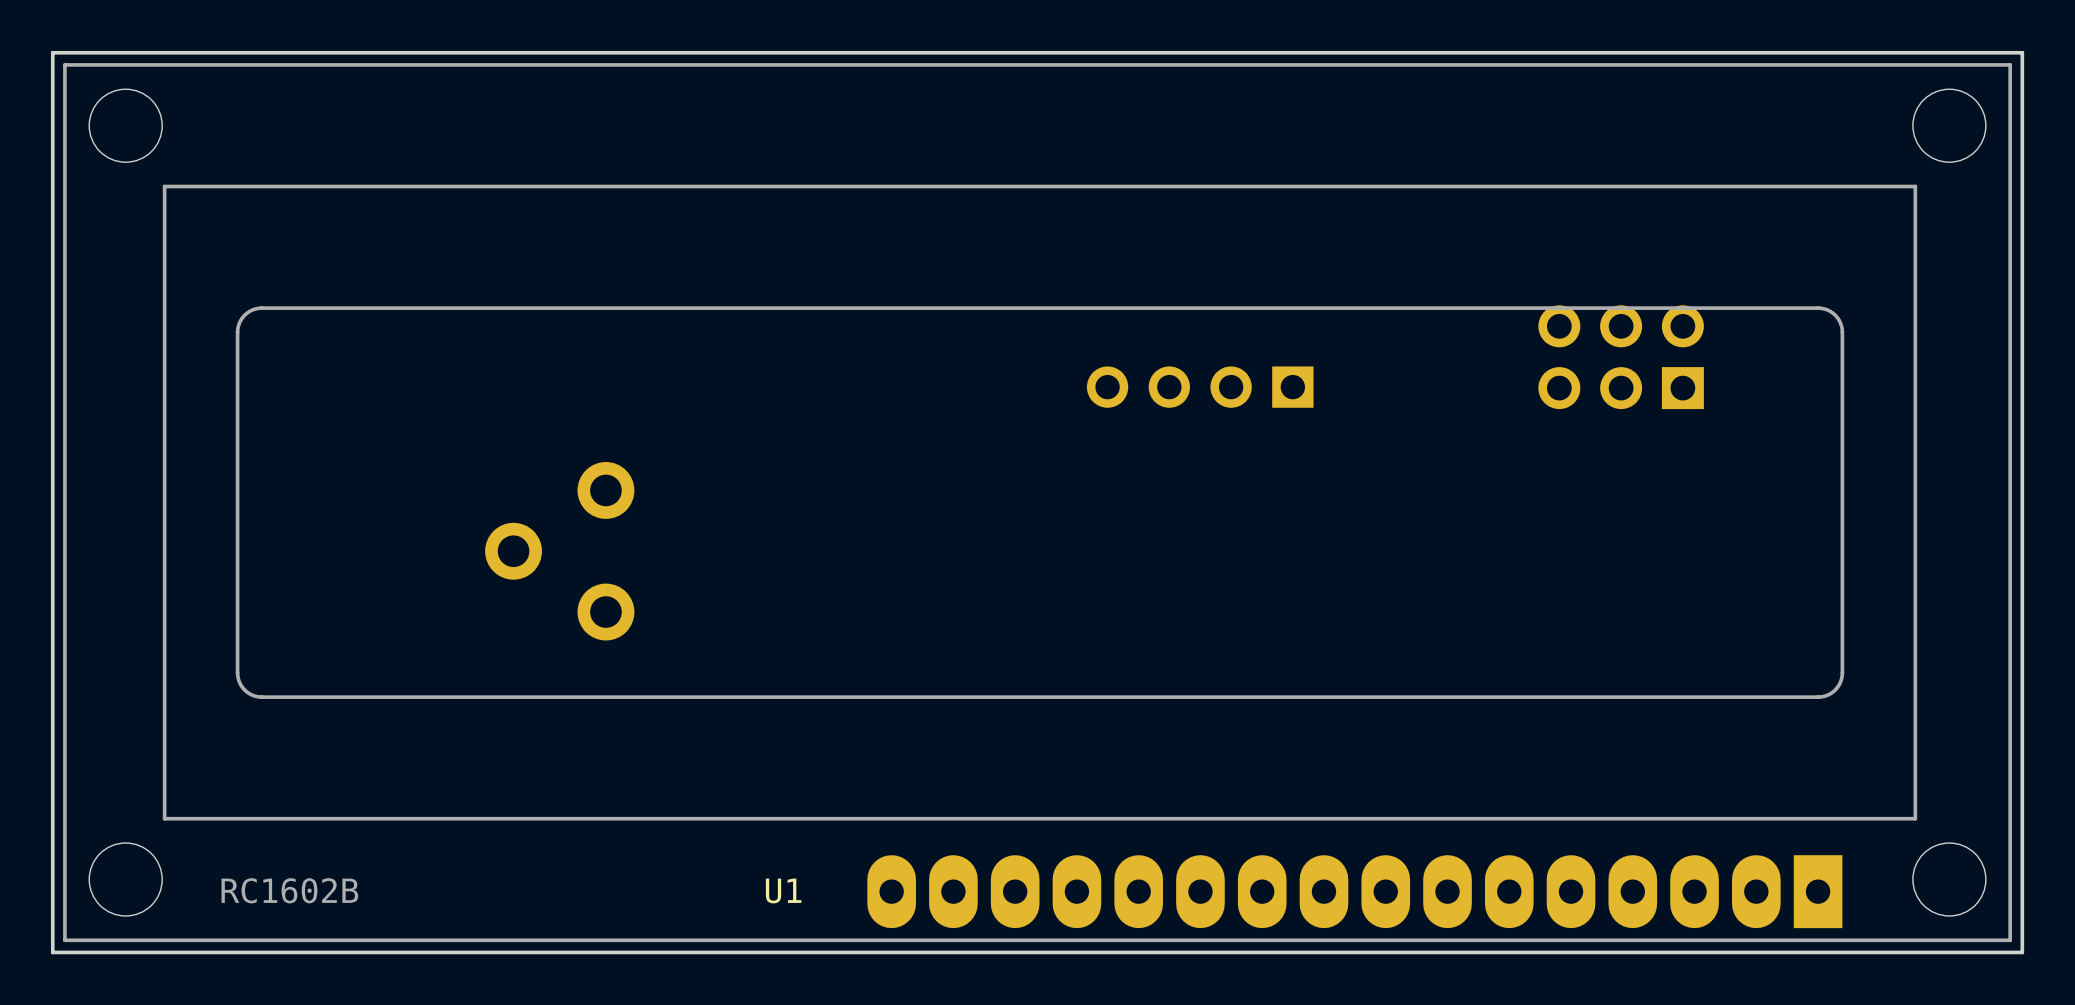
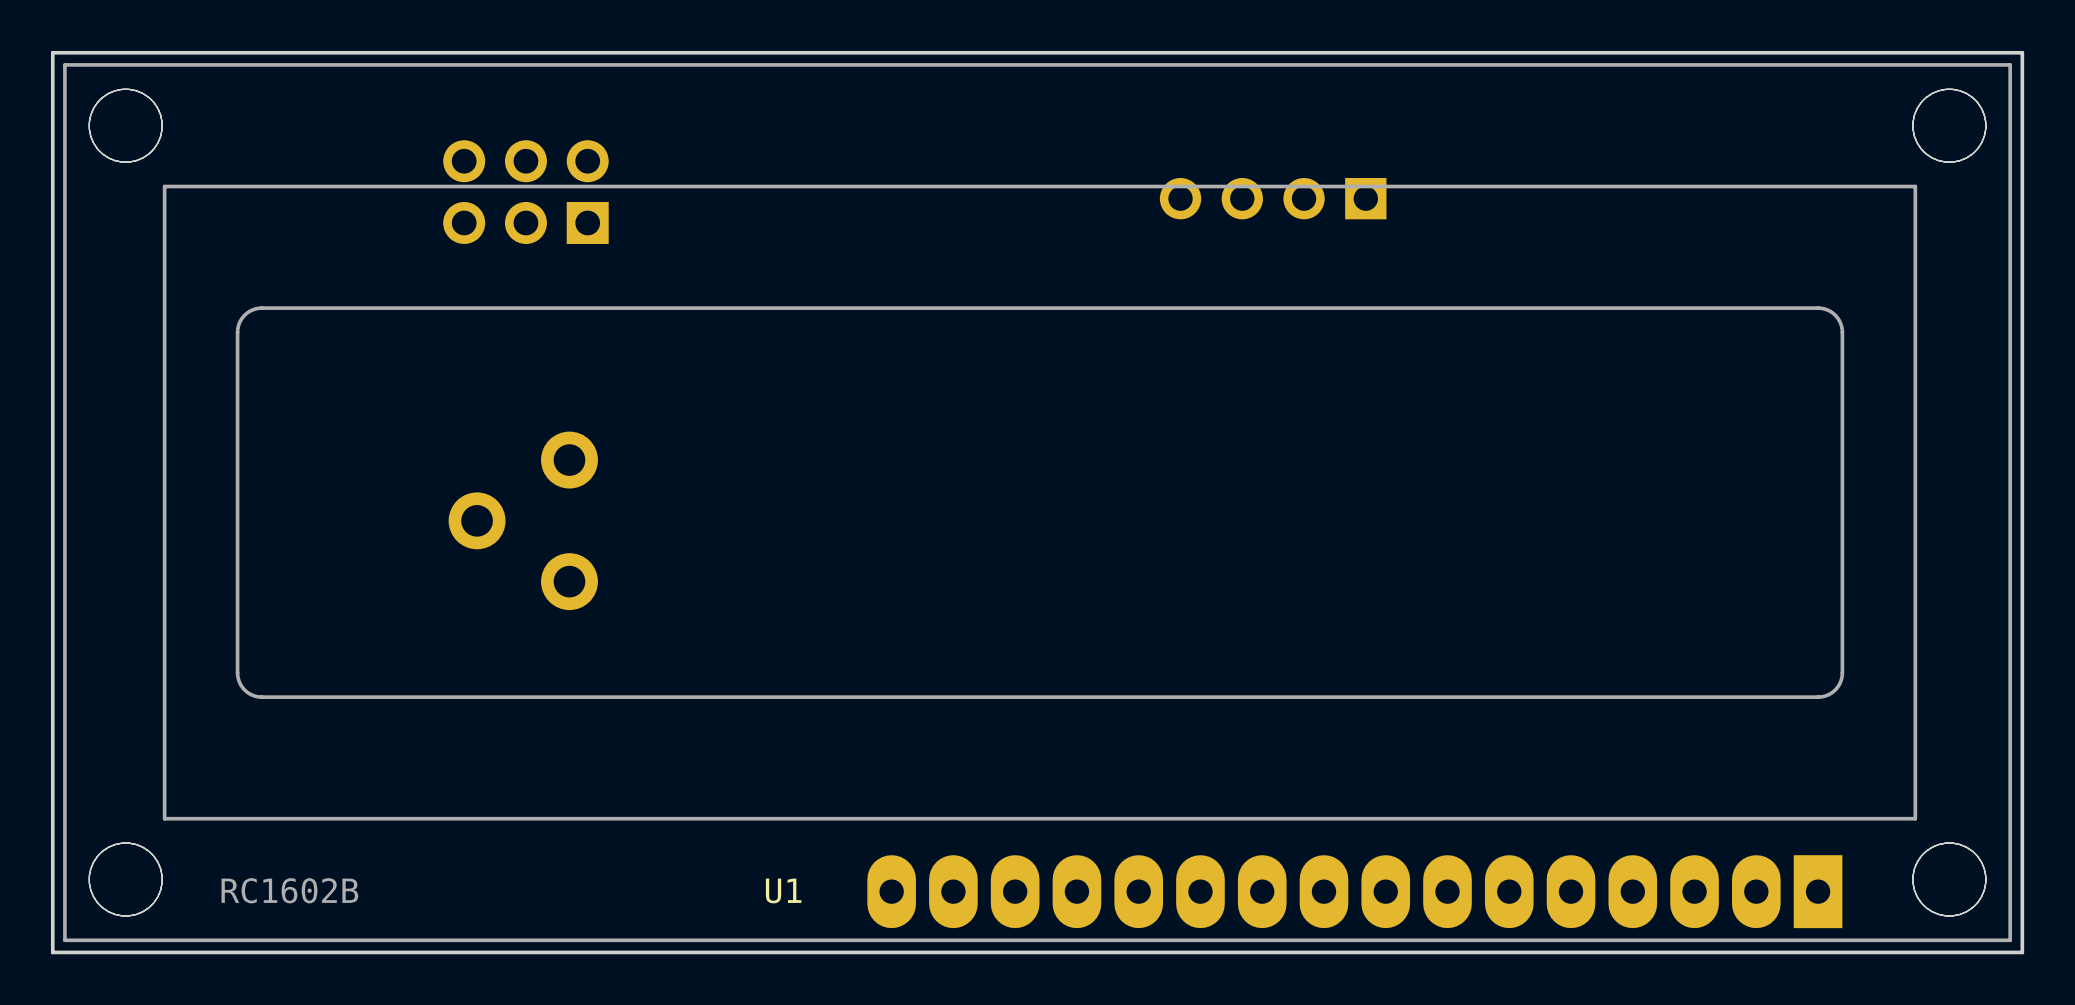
U1 footprint: [63, 63, 2012, 943] -> [63, 63, 2012, 943]
part: none -> (525, 192)
part: (1621, 357) -> none
part position: (1200, 387) -> (1273, 198)
part position: (559, 551) -> (523, 520)

